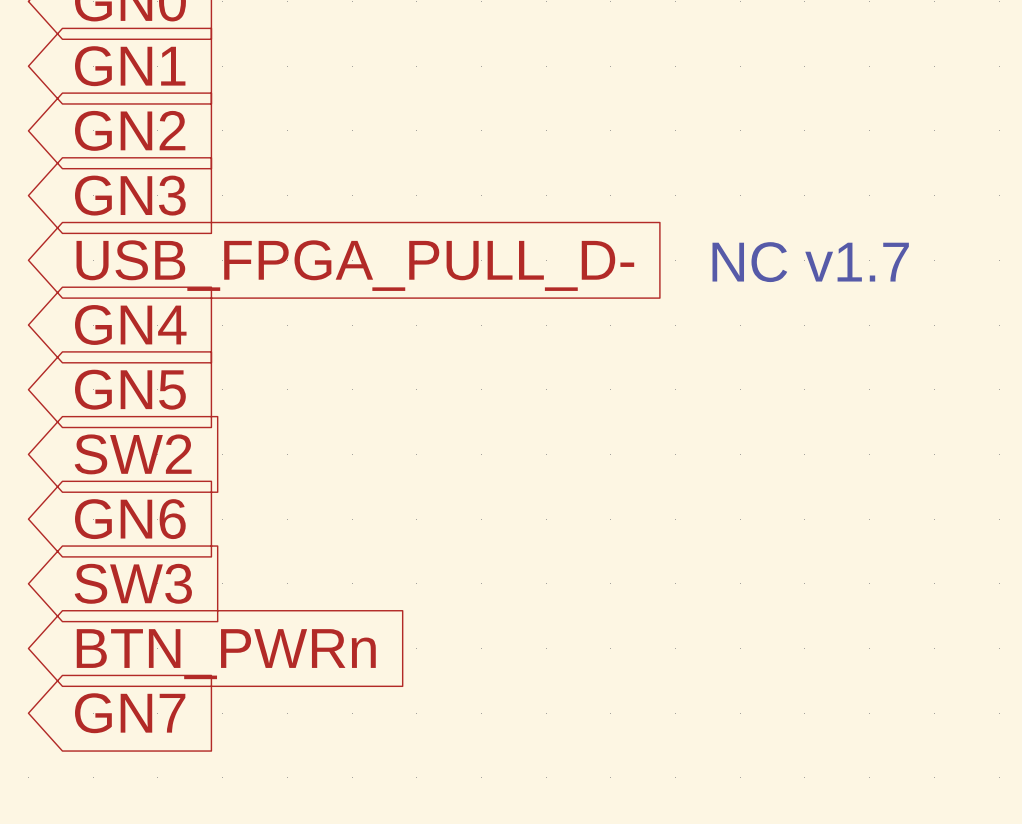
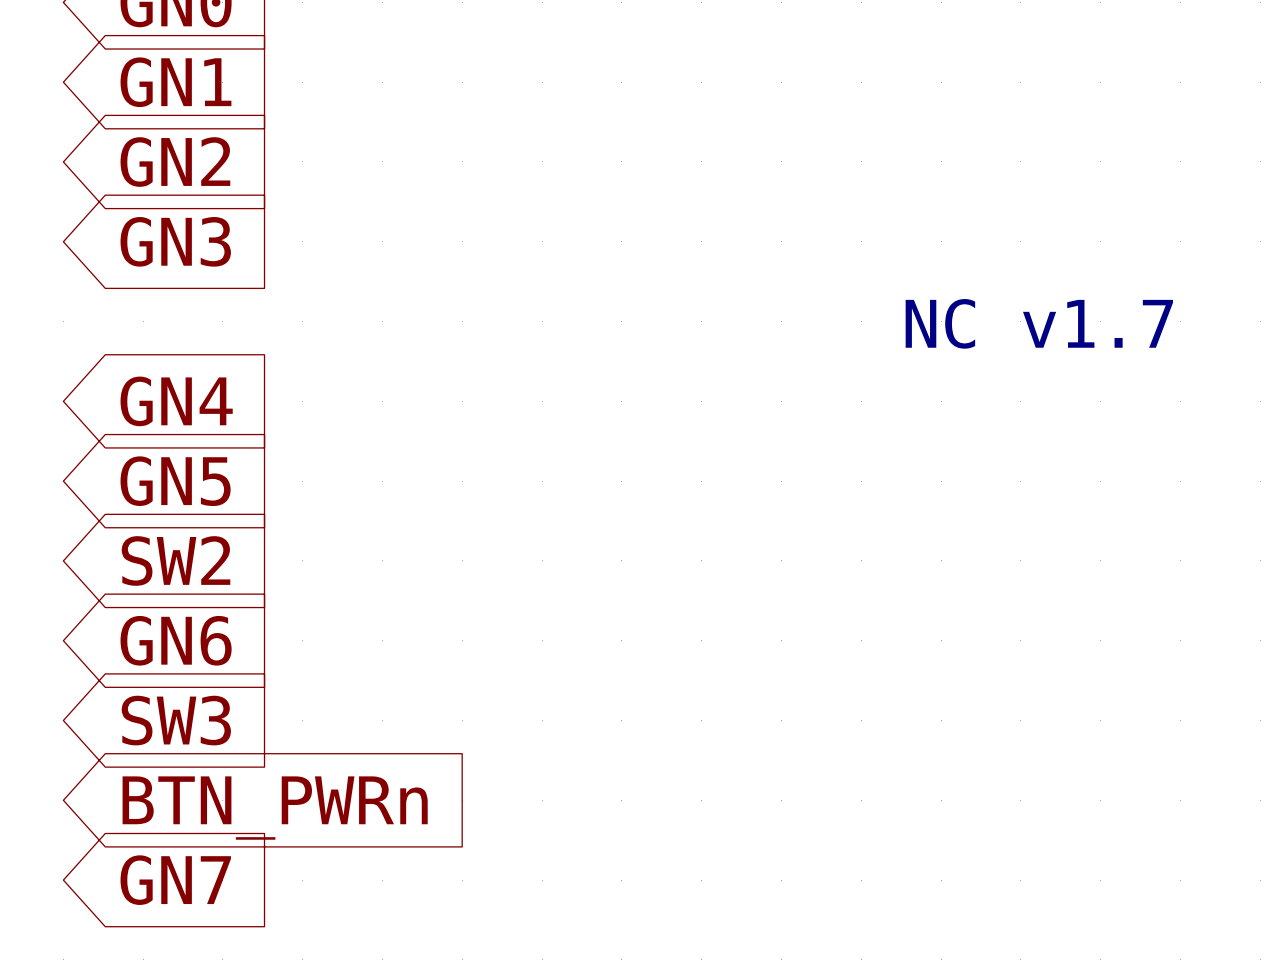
global label: USB_FPGA_PULL_D- (355, 265) -> none

